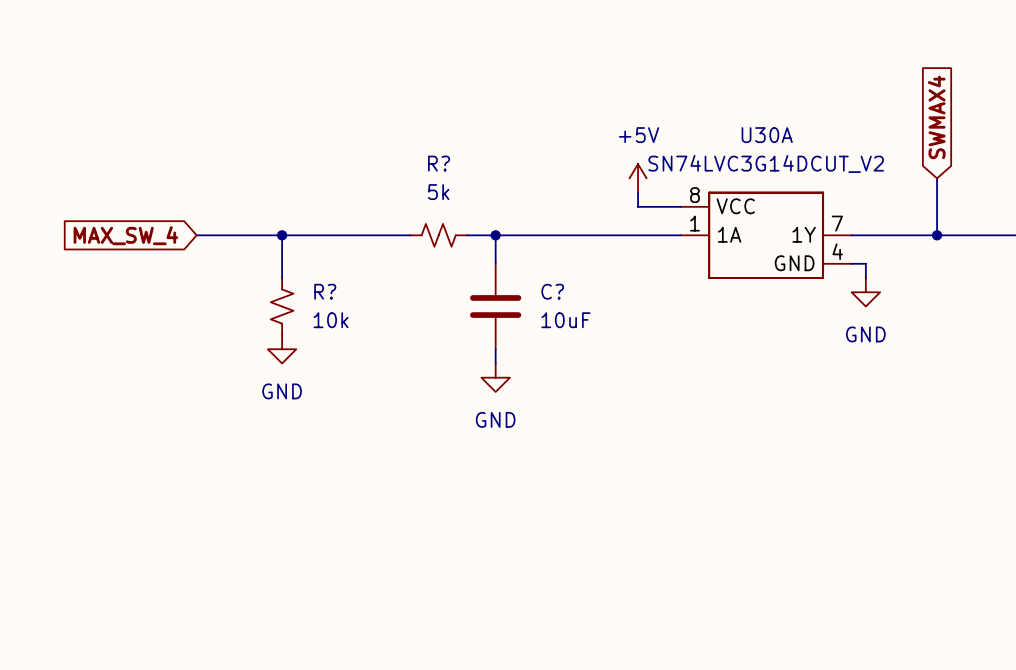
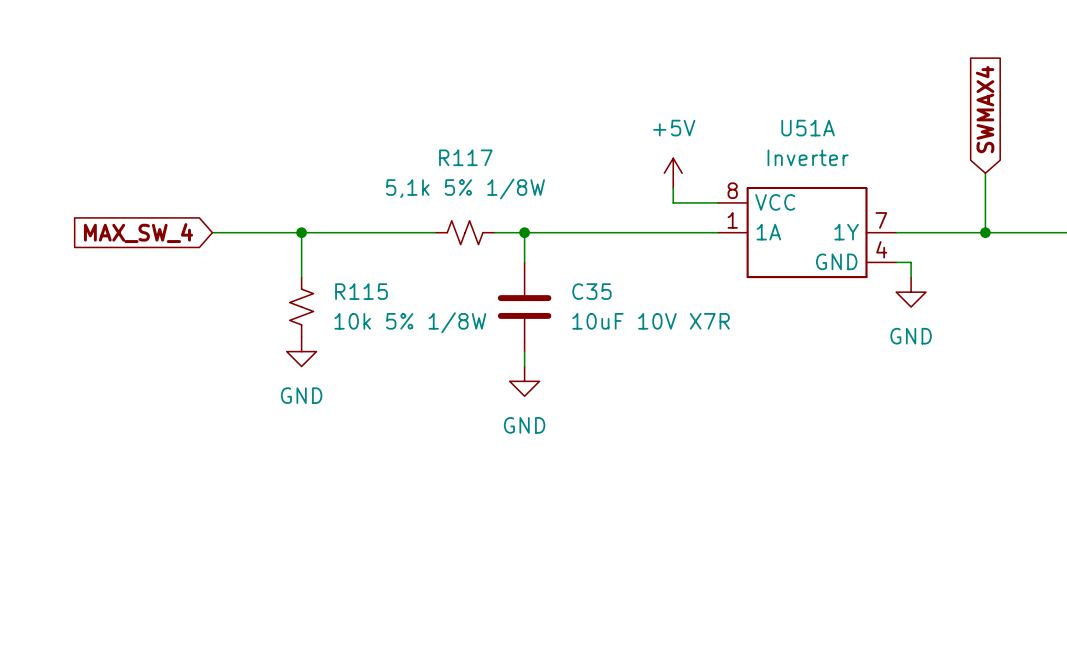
U30A name: U30A (767, 135) -> U51A (808, 128)
R? name: R? (439, 163) -> R117 (465, 157)
U30A value: SN74LVC3G14DCUT_V2 (766, 163) -> Inverter (808, 157)
R? value: 5k (438, 192) -> 5,1k 5% 1/8W (465, 188)
R? name: R? (325, 291) -> R115 (361, 291)
C? name: C? (552, 291) -> C35 (591, 291)
R? value: 10k (331, 320) -> 10k 5% 1/8W (410, 322)
C? value: 10uF (565, 320) -> 10uF 10V X7R (651, 321)

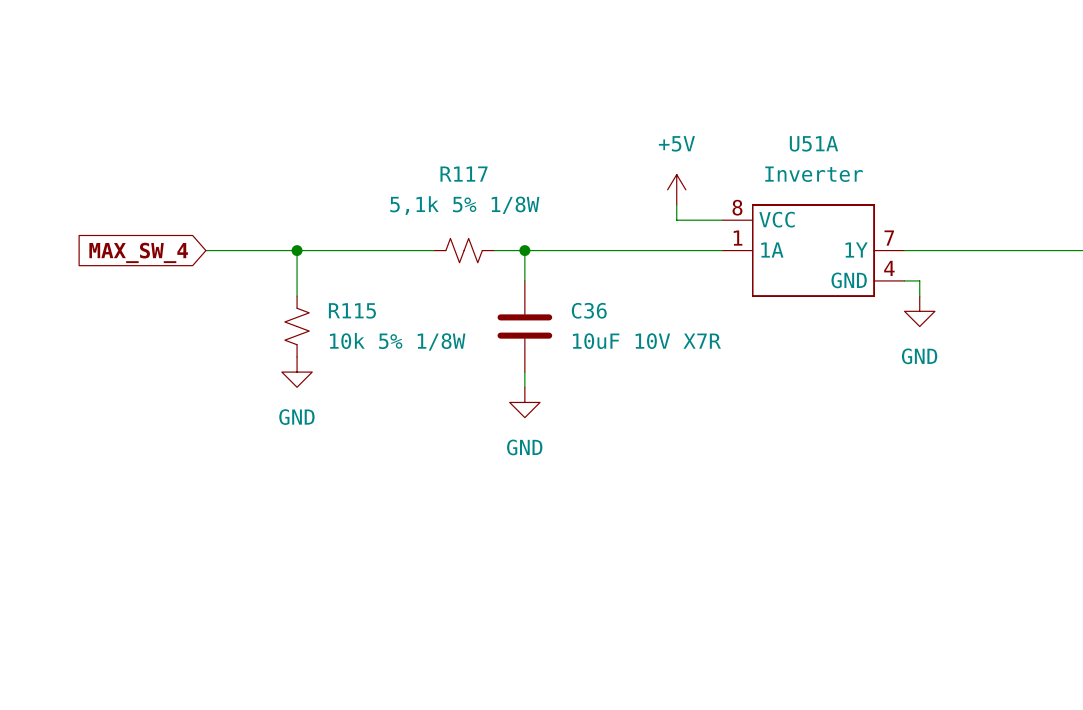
global label: SWMAX4 (985, 109) -> none
wire: (985, 173) (985, 232) -> none
junction: (985, 232) -> none
C35 name: C35 (591, 291) -> C36 (589, 310)

